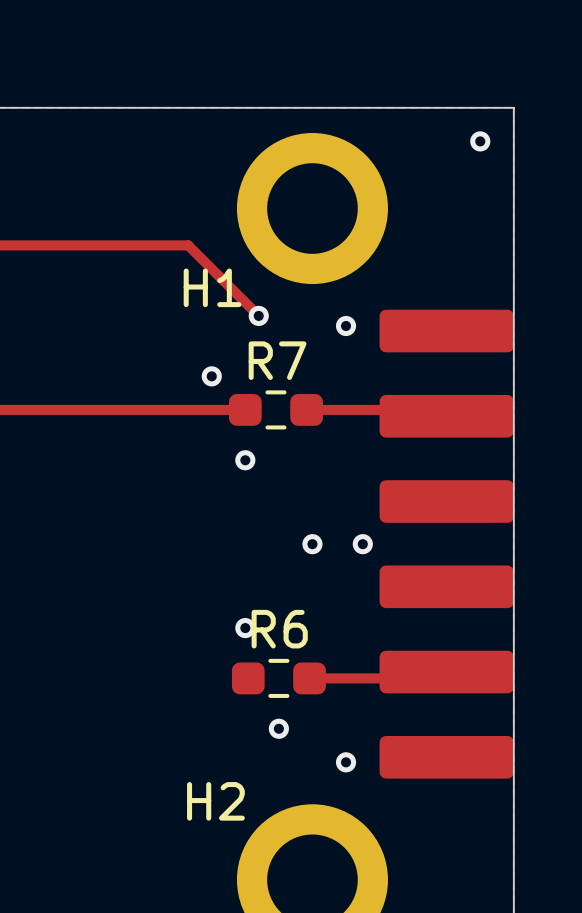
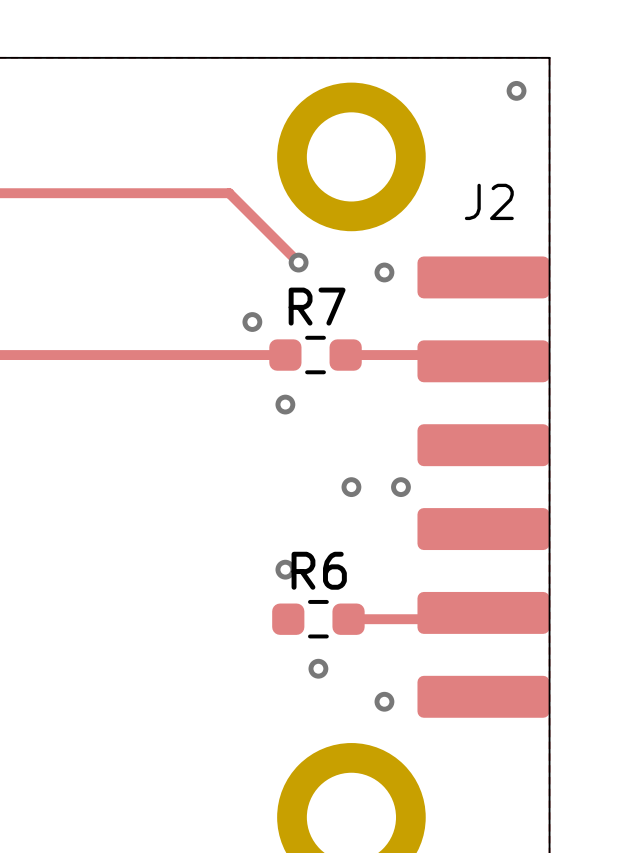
J2 name: none -> J2 (489, 201)
H1 name: H1 (212, 287) -> none
H2 name: H2 (215, 801) -> none

